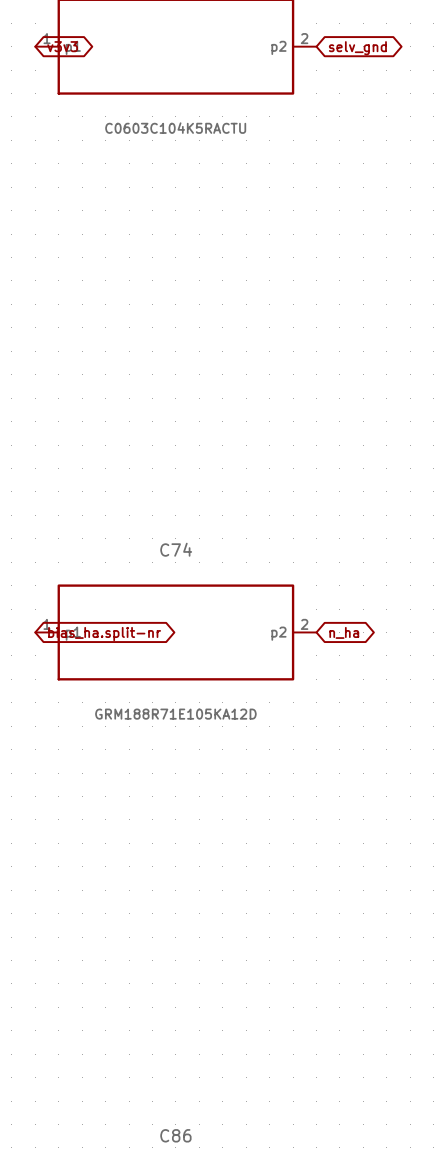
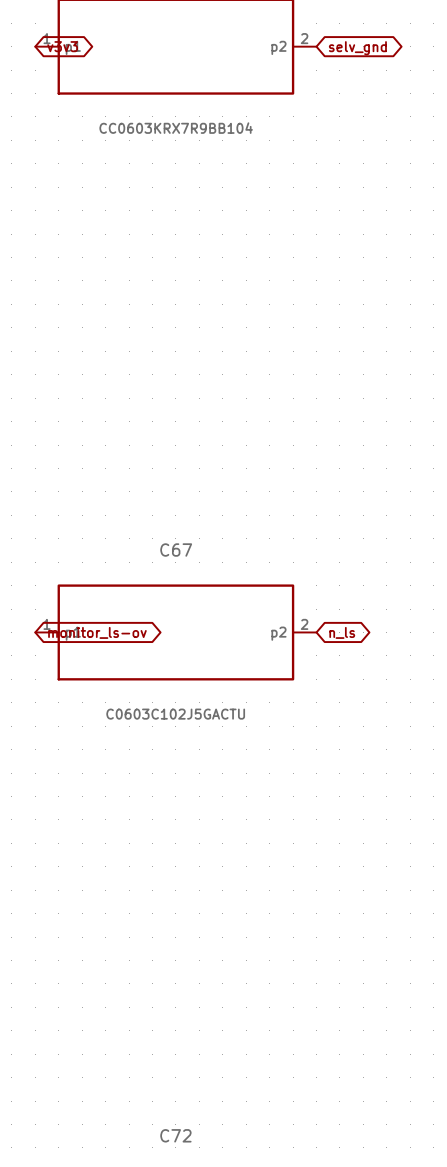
part value: C0603C104K5RACTU (175, 128) -> CC0603KRX7R9BB104 (176, 128)
C74 name: C74 (176, 549) -> C67 (176, 550)
global label: n_ha (344, 632) -> n_ls (342, 632)
global label: bias_ha.split-nr (104, 634) -> monitor_ls-ov (97, 632)
C74 value: GRM188R71E105KA12D (175, 714) -> C0603C102J5GACTU (175, 714)
C86 name: C86 (175, 1135) -> C72 (175, 1135)

